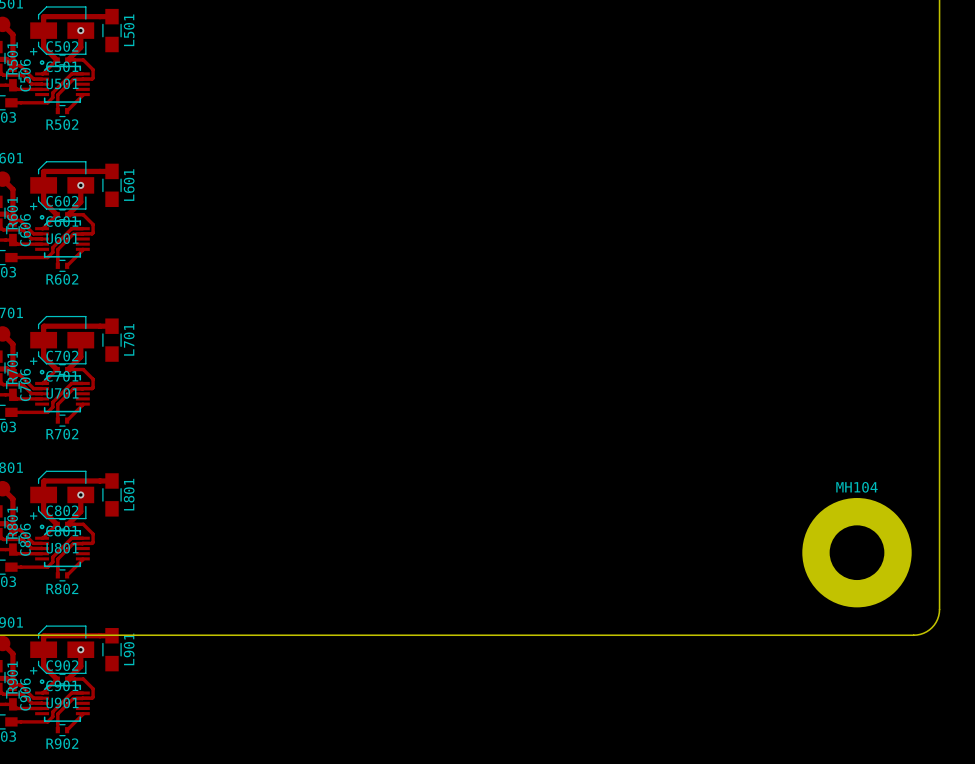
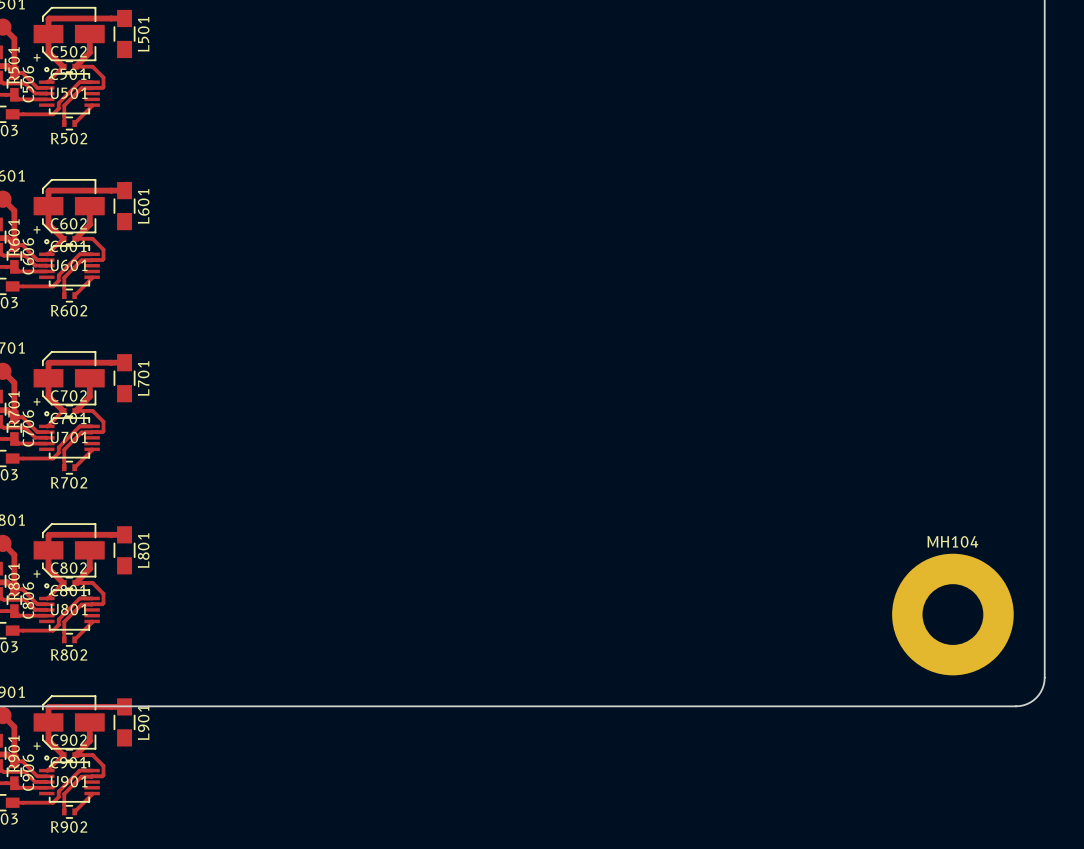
via: (80, 30) -> none
via: (80, 185) -> none
via: (80, 494) -> none
via: (80, 649) -> none

